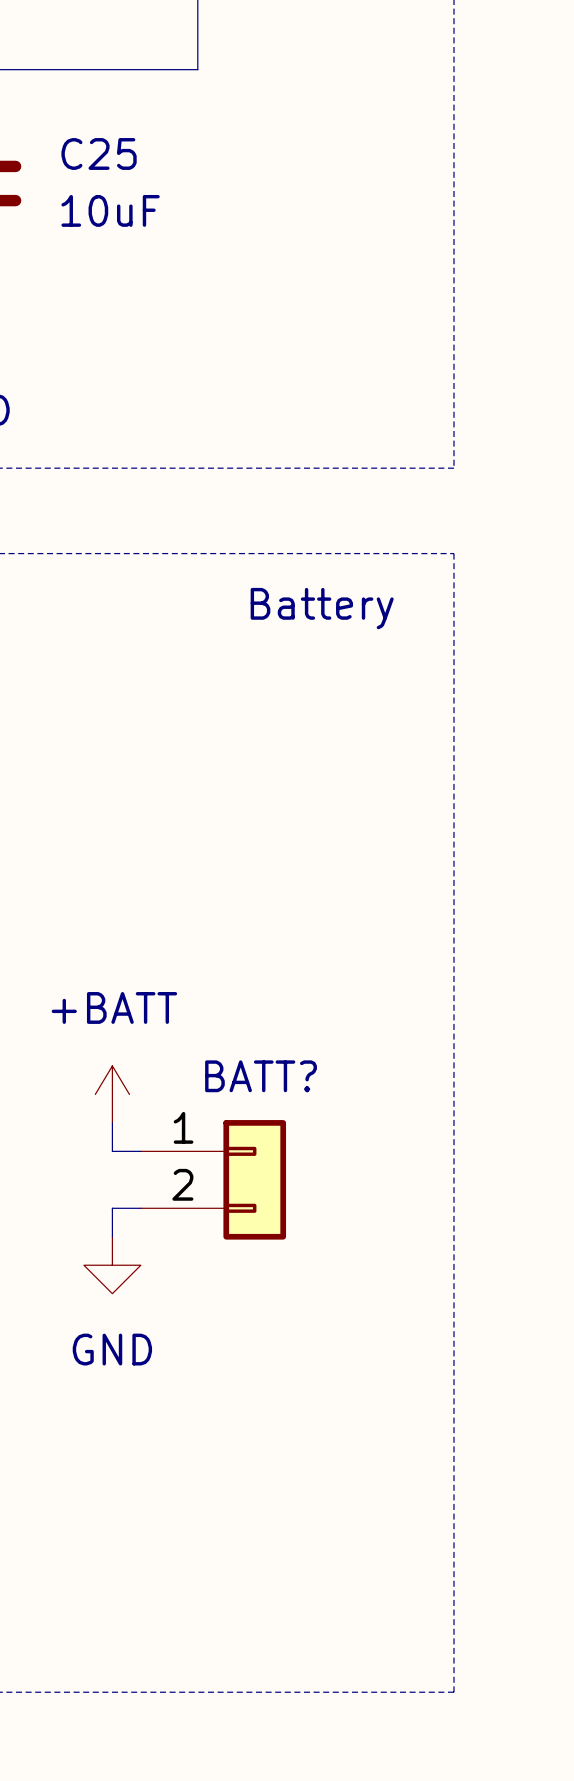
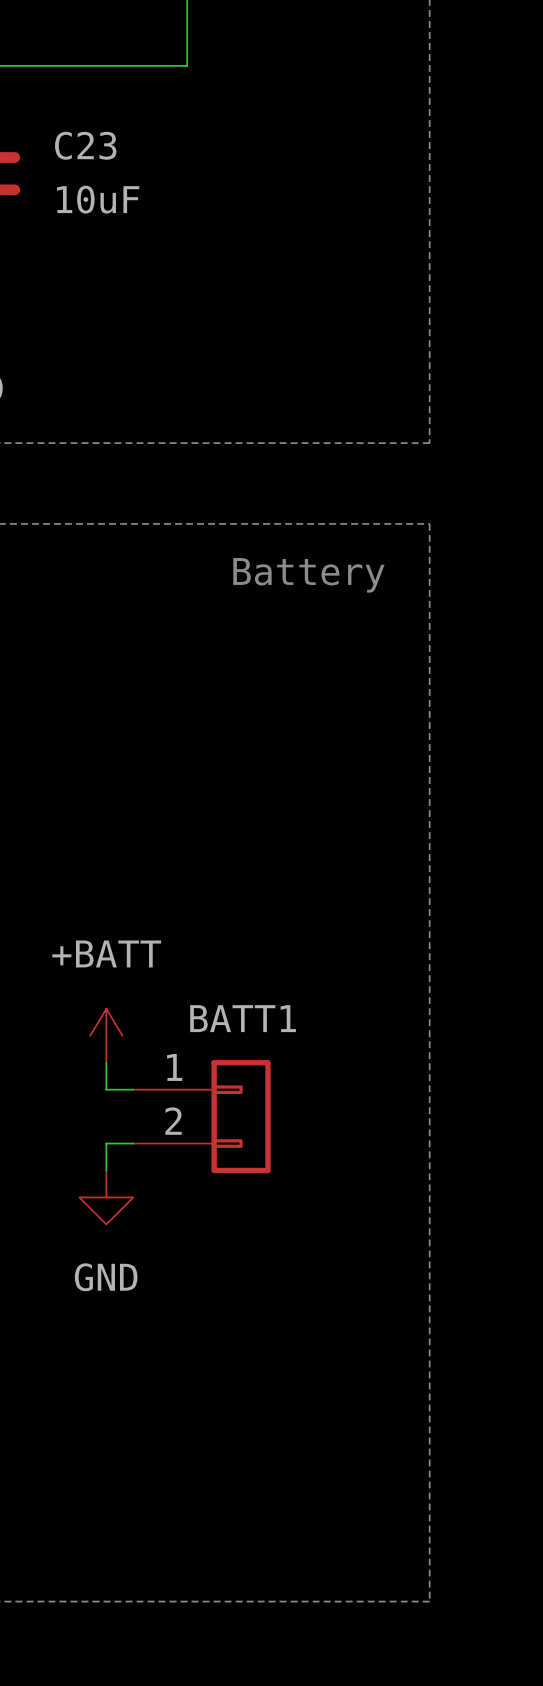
C25 name: C25 (99, 153) -> C23 (85, 145)
BATT? name: BATT? (261, 1076) -> BATT1 (243, 1018)

